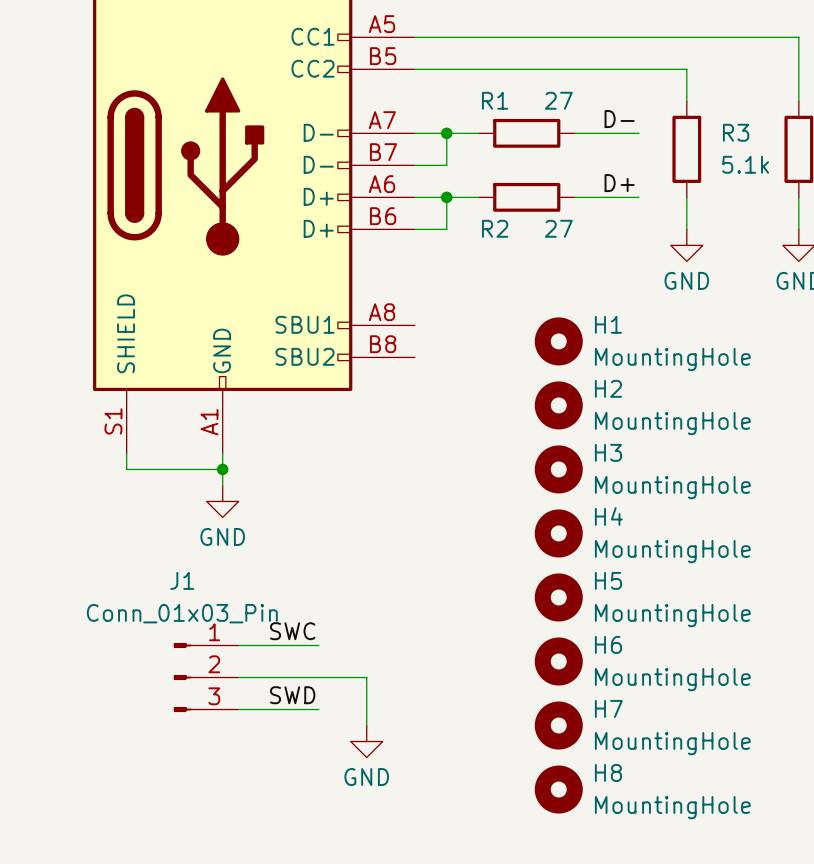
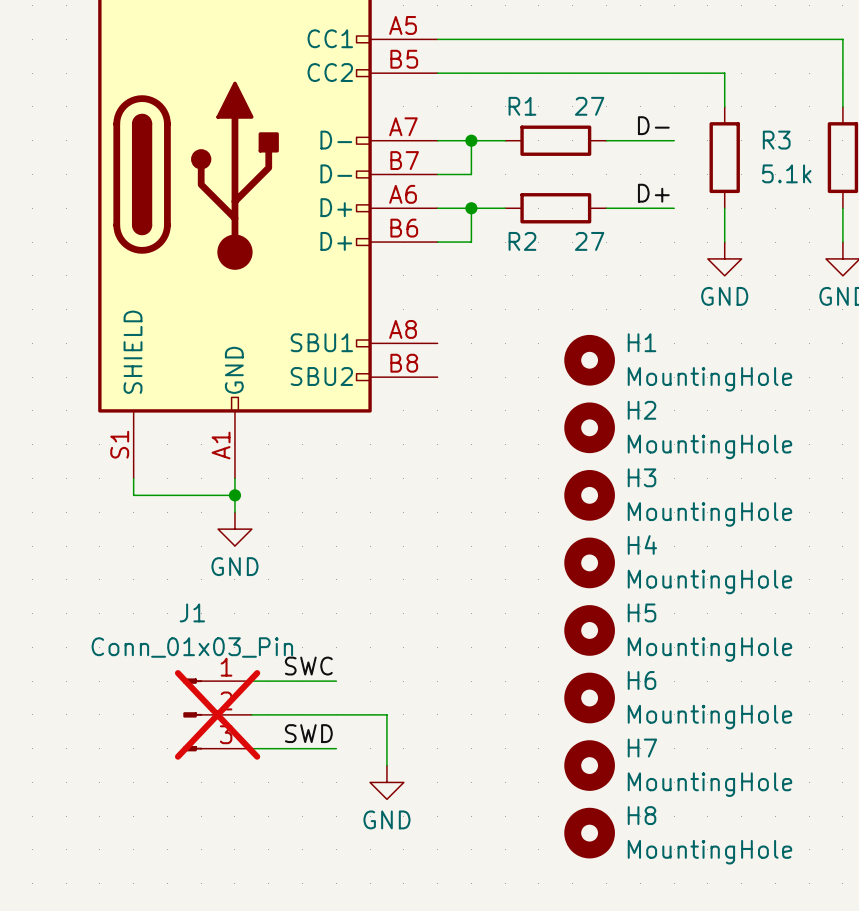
J1 do-not-place cross: none -> (217, 714)

